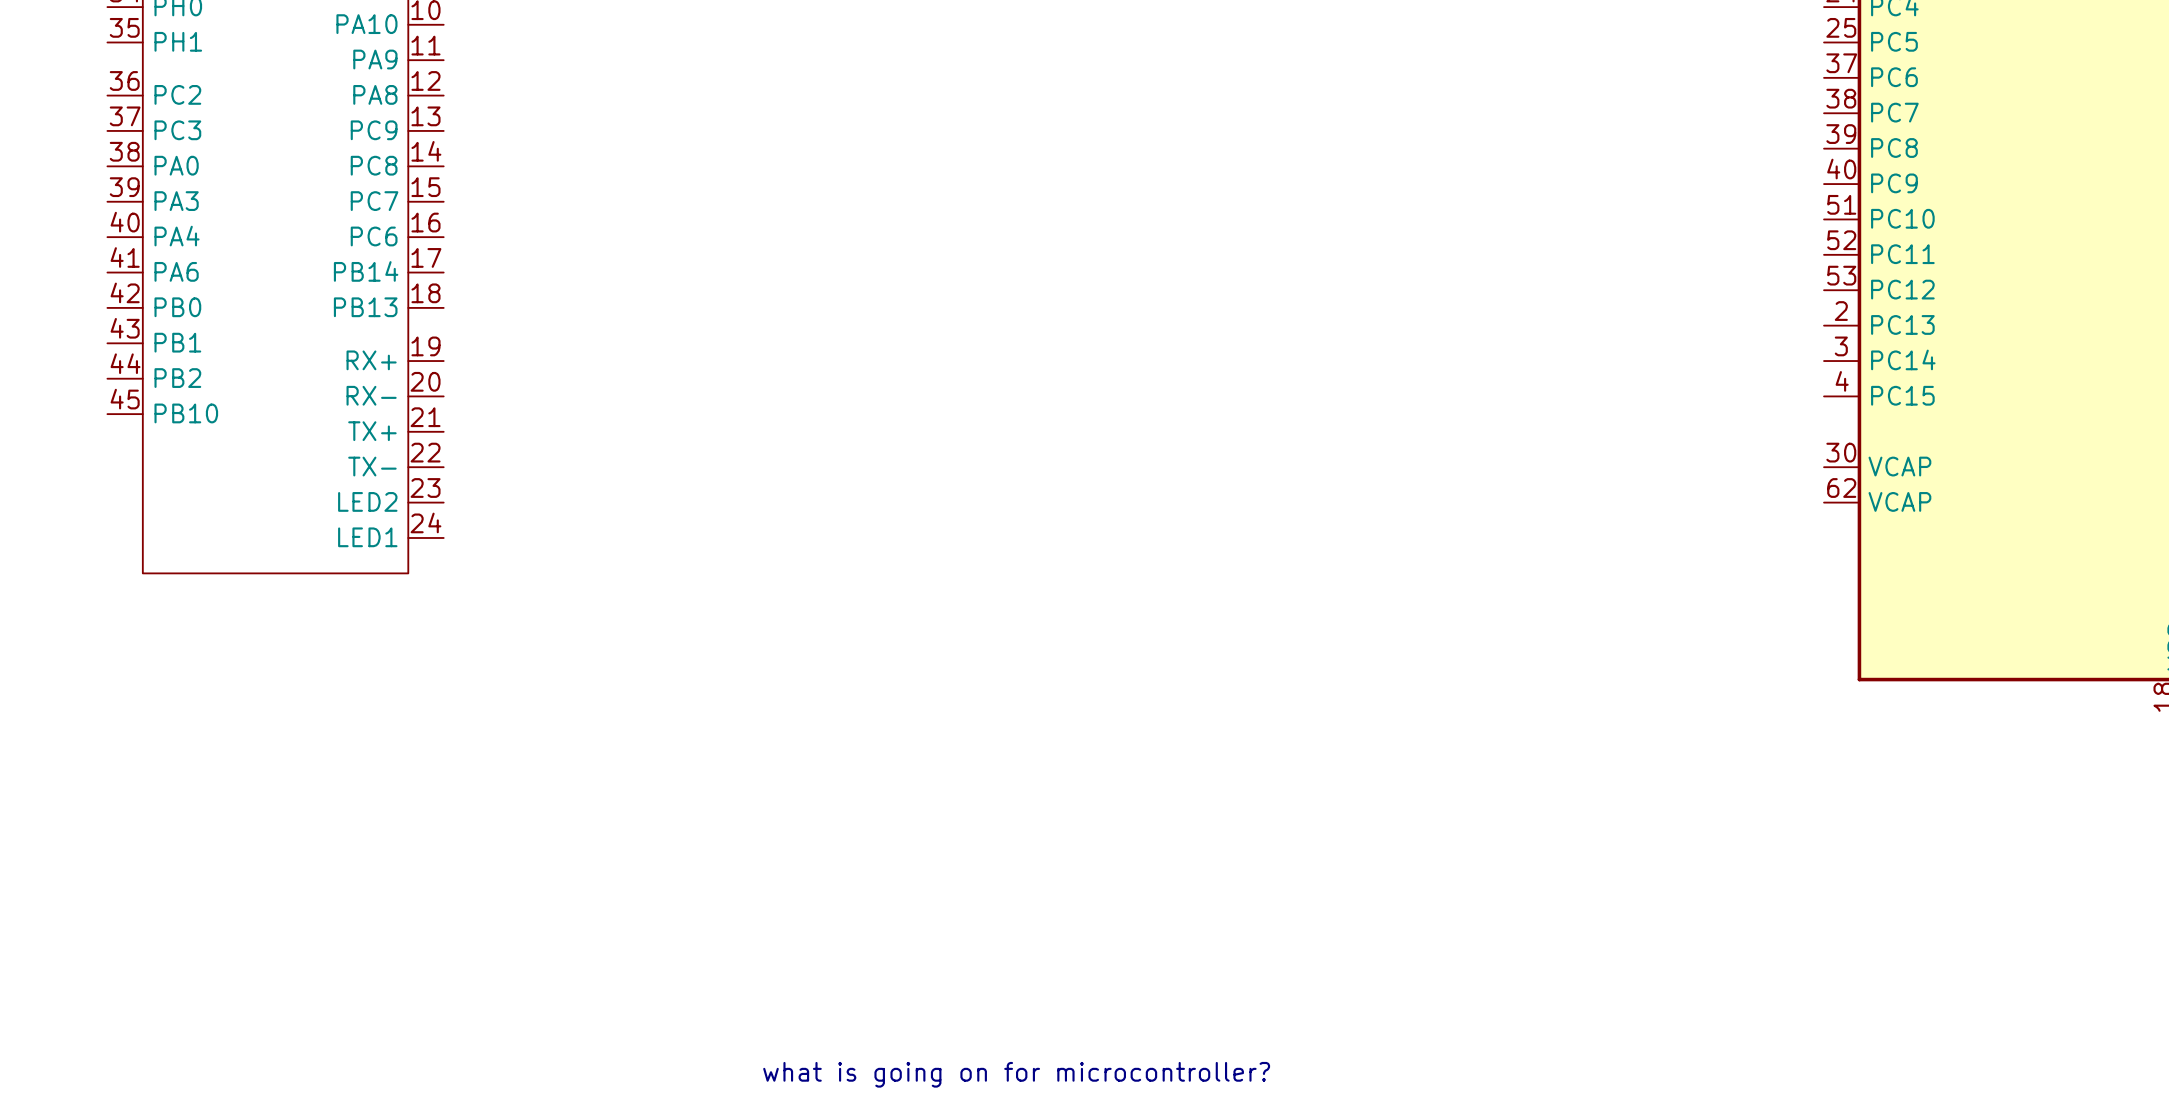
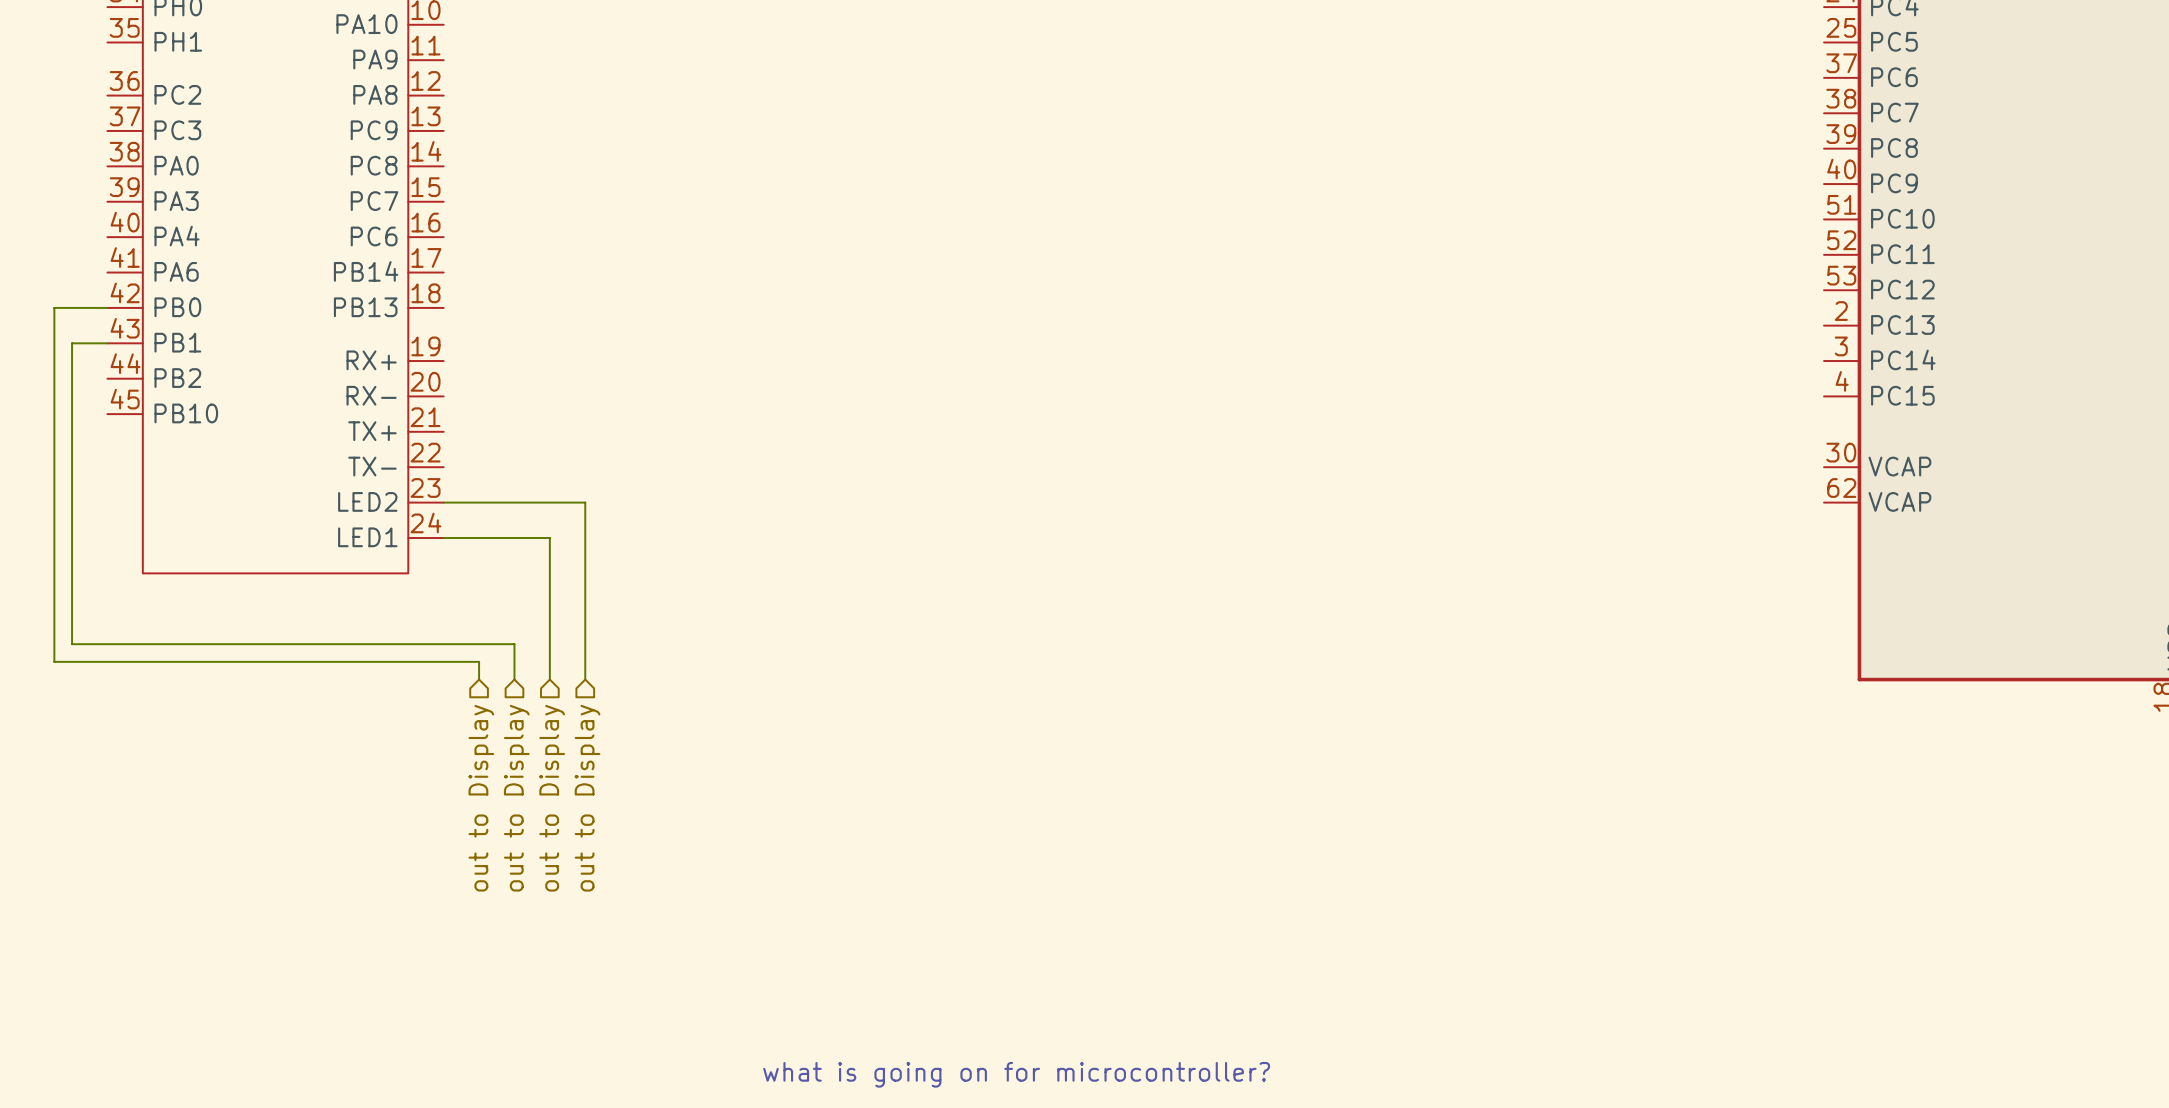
wire: none -> (107, 307) (54, 307) (54, 661) (479, 661) (479, 679)
wire: none -> (107, 343) (72, 343) (72, 644) (514, 644) (514, 679)
wire: none -> (443, 502) (585, 502) (585, 679)
wire: none -> (443, 537) (549, 537) (549, 679)
hierarchical label: none -> out to Display (481, 798)
hierarchical label: none -> out to Display (516, 798)
hierarchical label: none -> out to Display (552, 798)
hierarchical label: none -> out to Display (587, 798)

